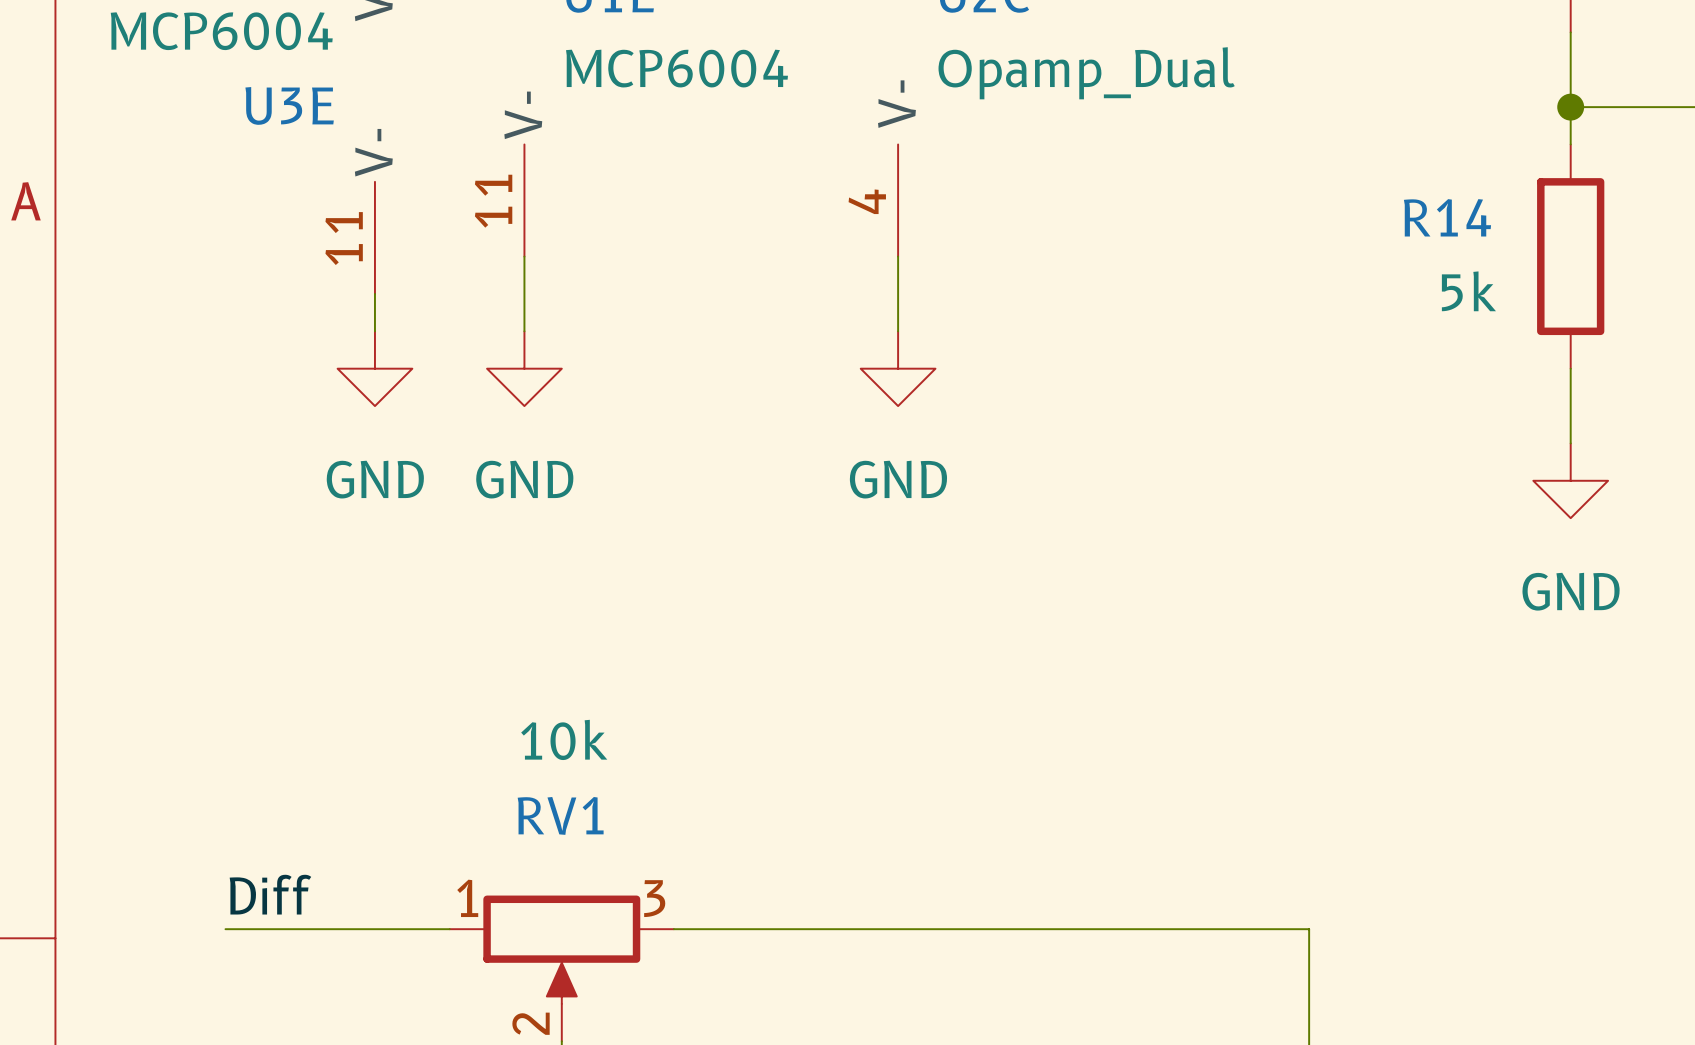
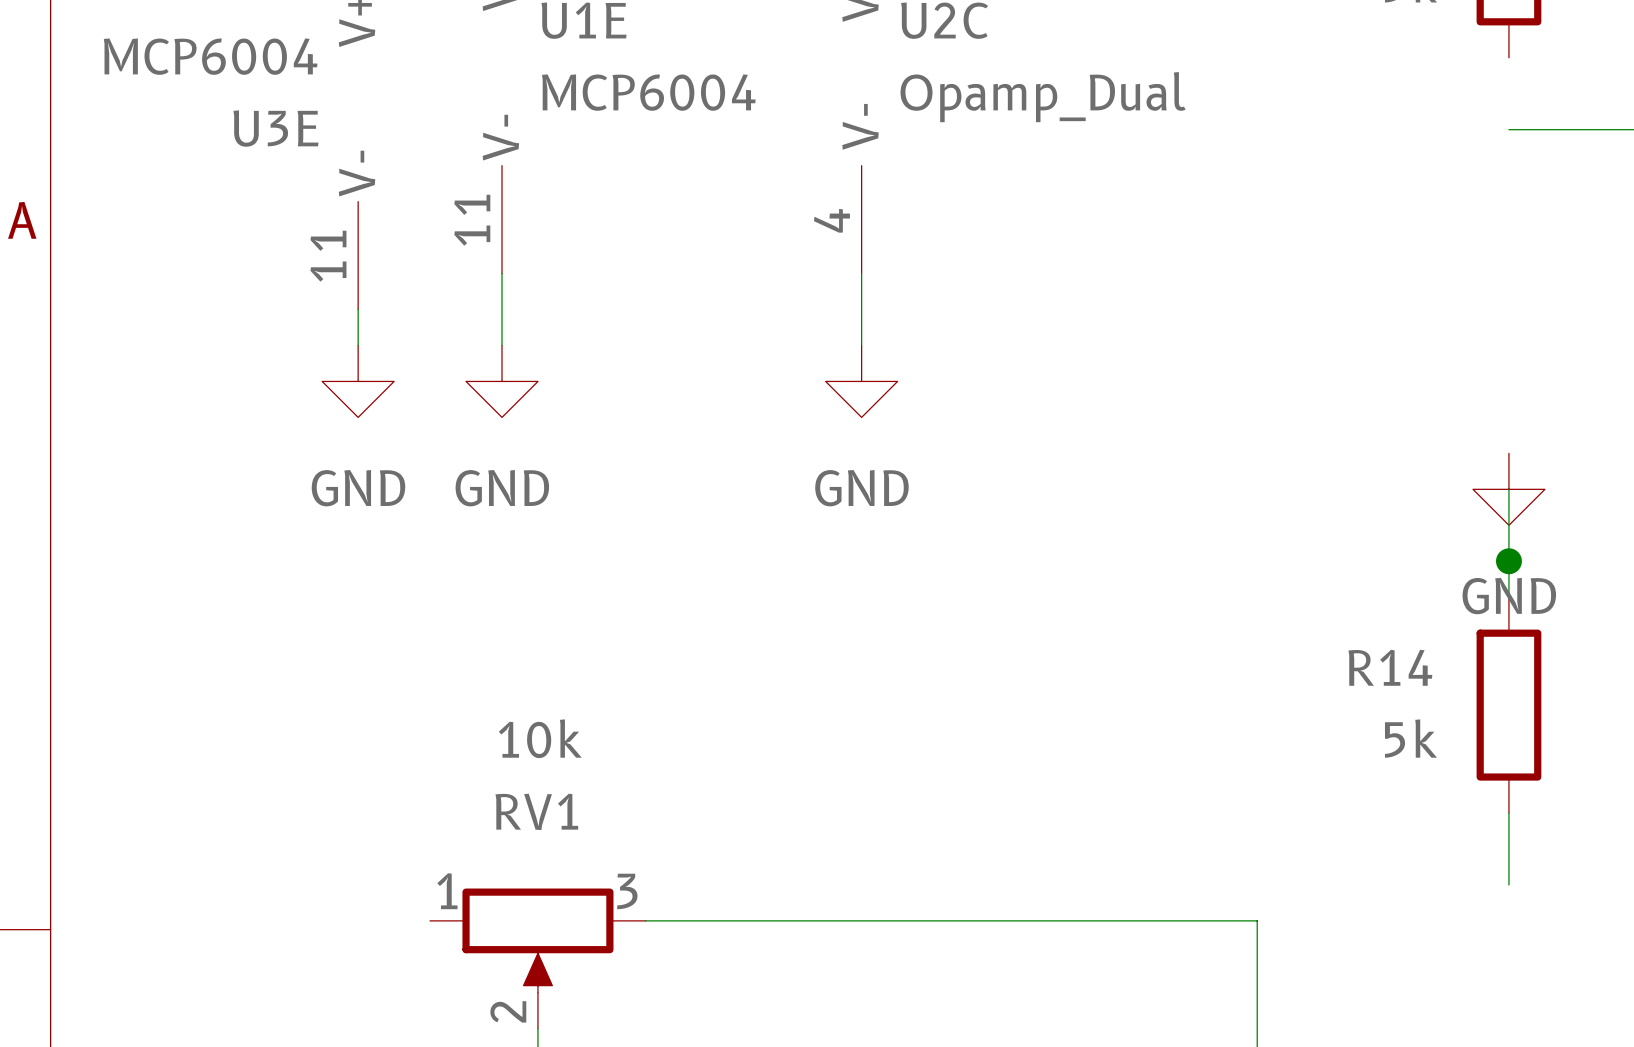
wire: (1570, 32) (1570, 144) -> (1508, 489) (1508, 597)
junction: (1570, 107) -> none
R14 position: (1570, 256) -> (1508, 705)
wire: (1570, 368) (1570, 443) -> (1508, 813) (1508, 884)
junction: none -> (1508, 561)
label: Diff (270, 894) -> none
wire: (225, 929) (449, 929) -> none

